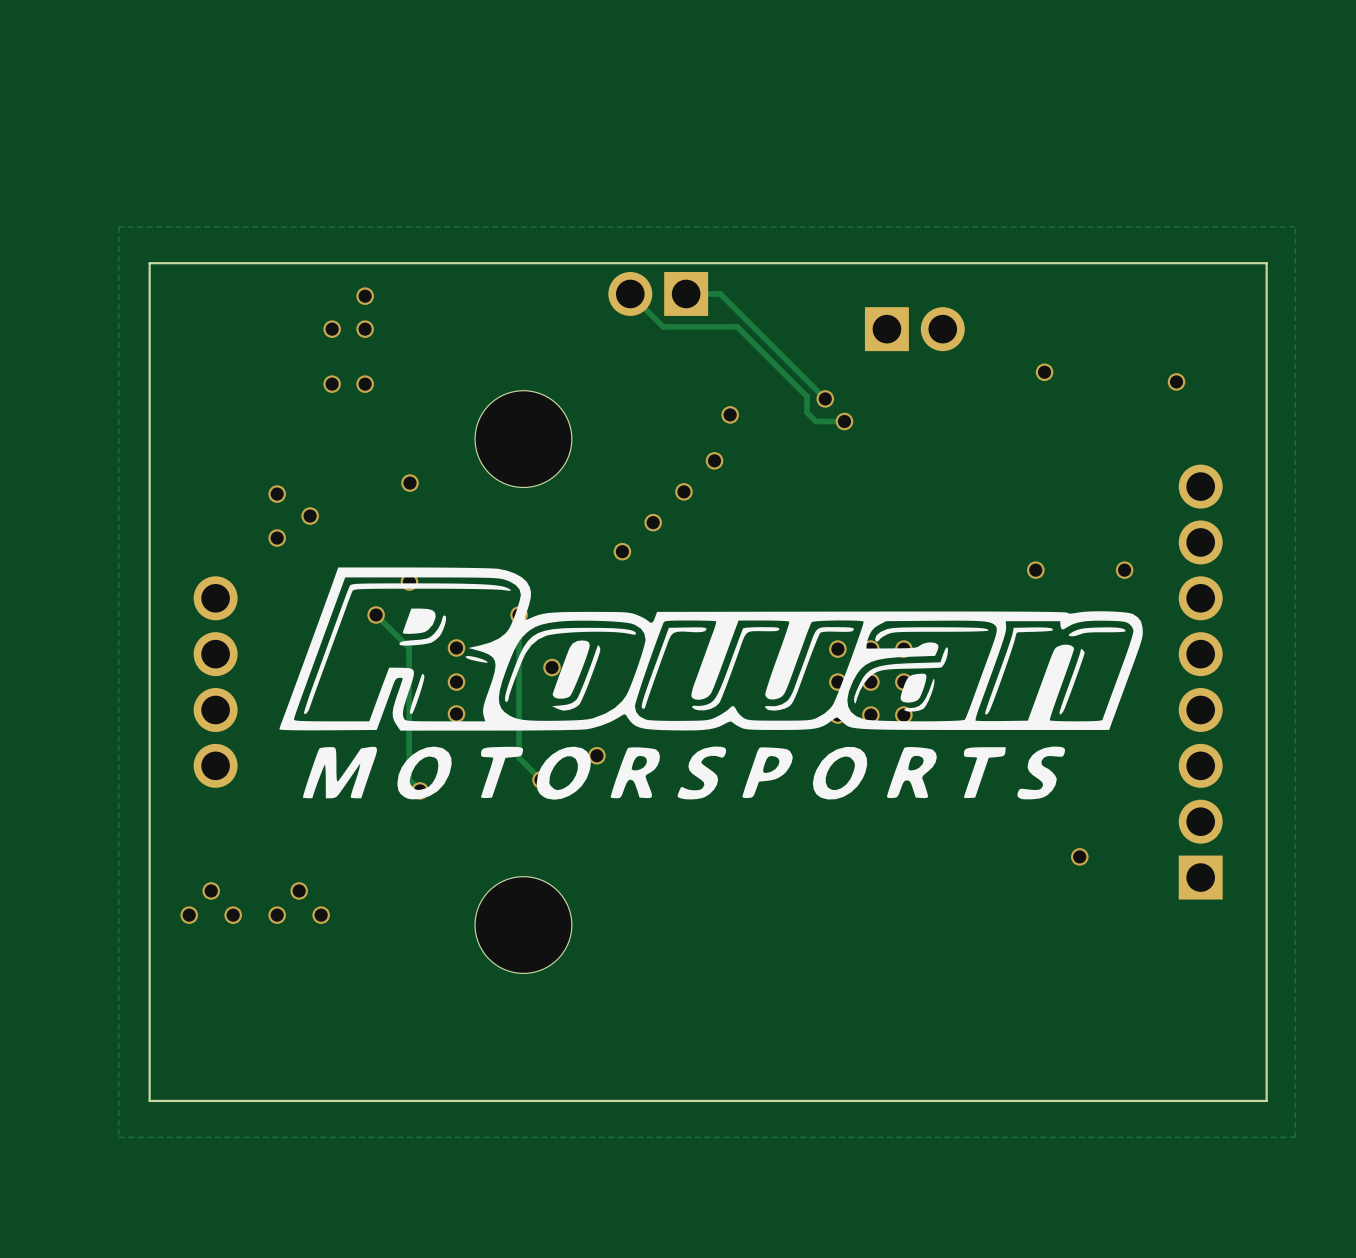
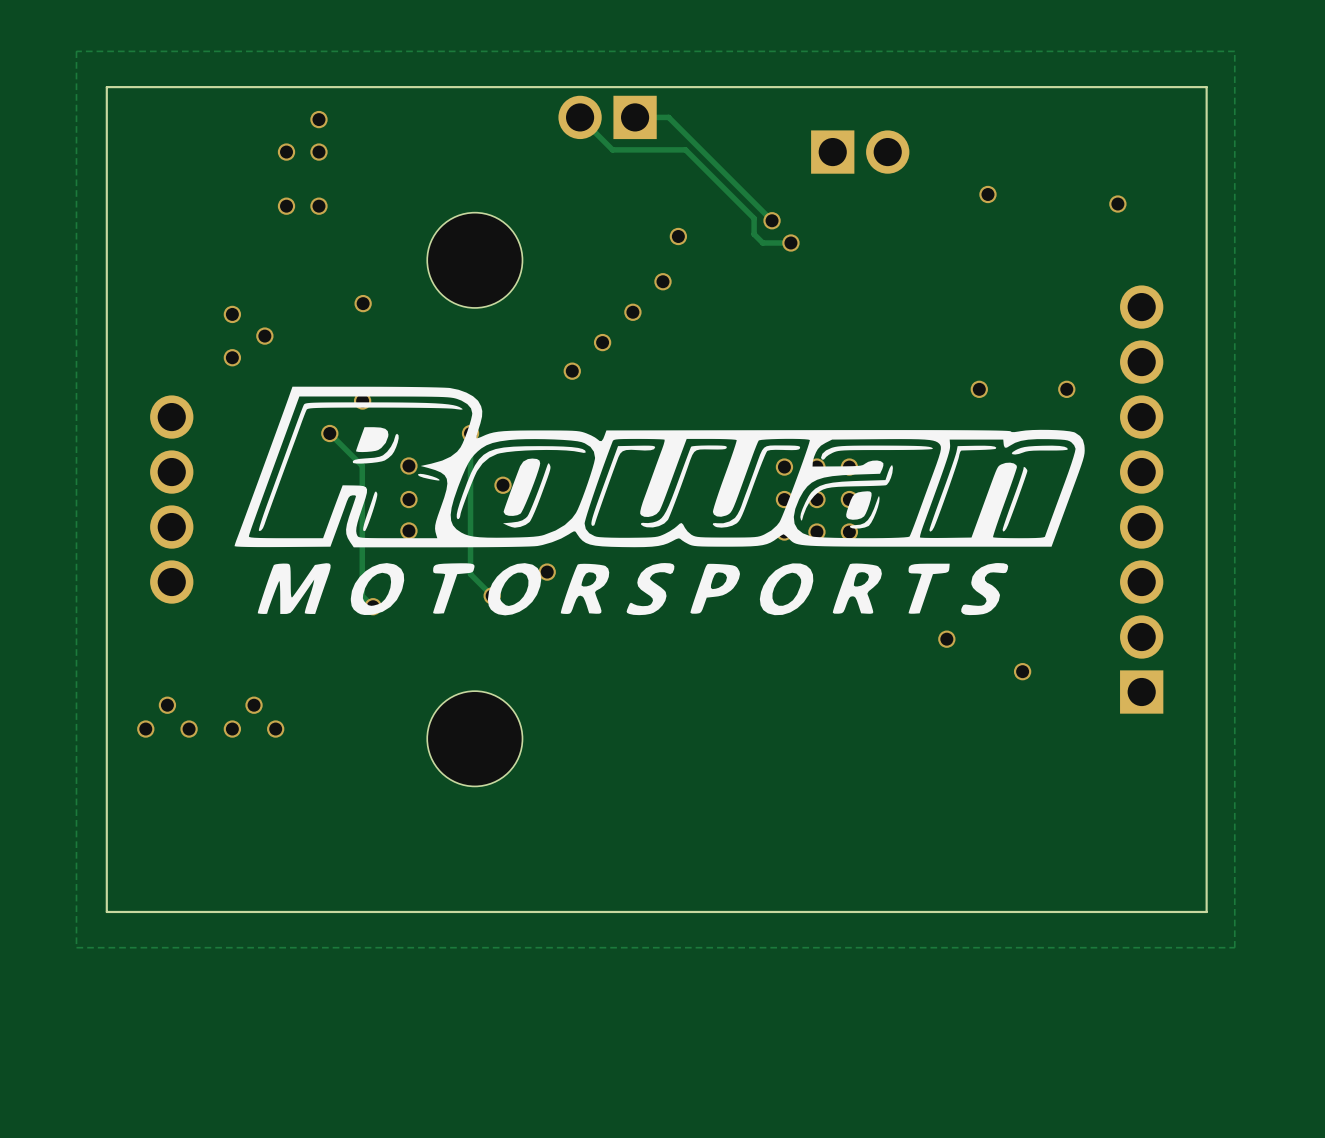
via: none -> (946, 639)

